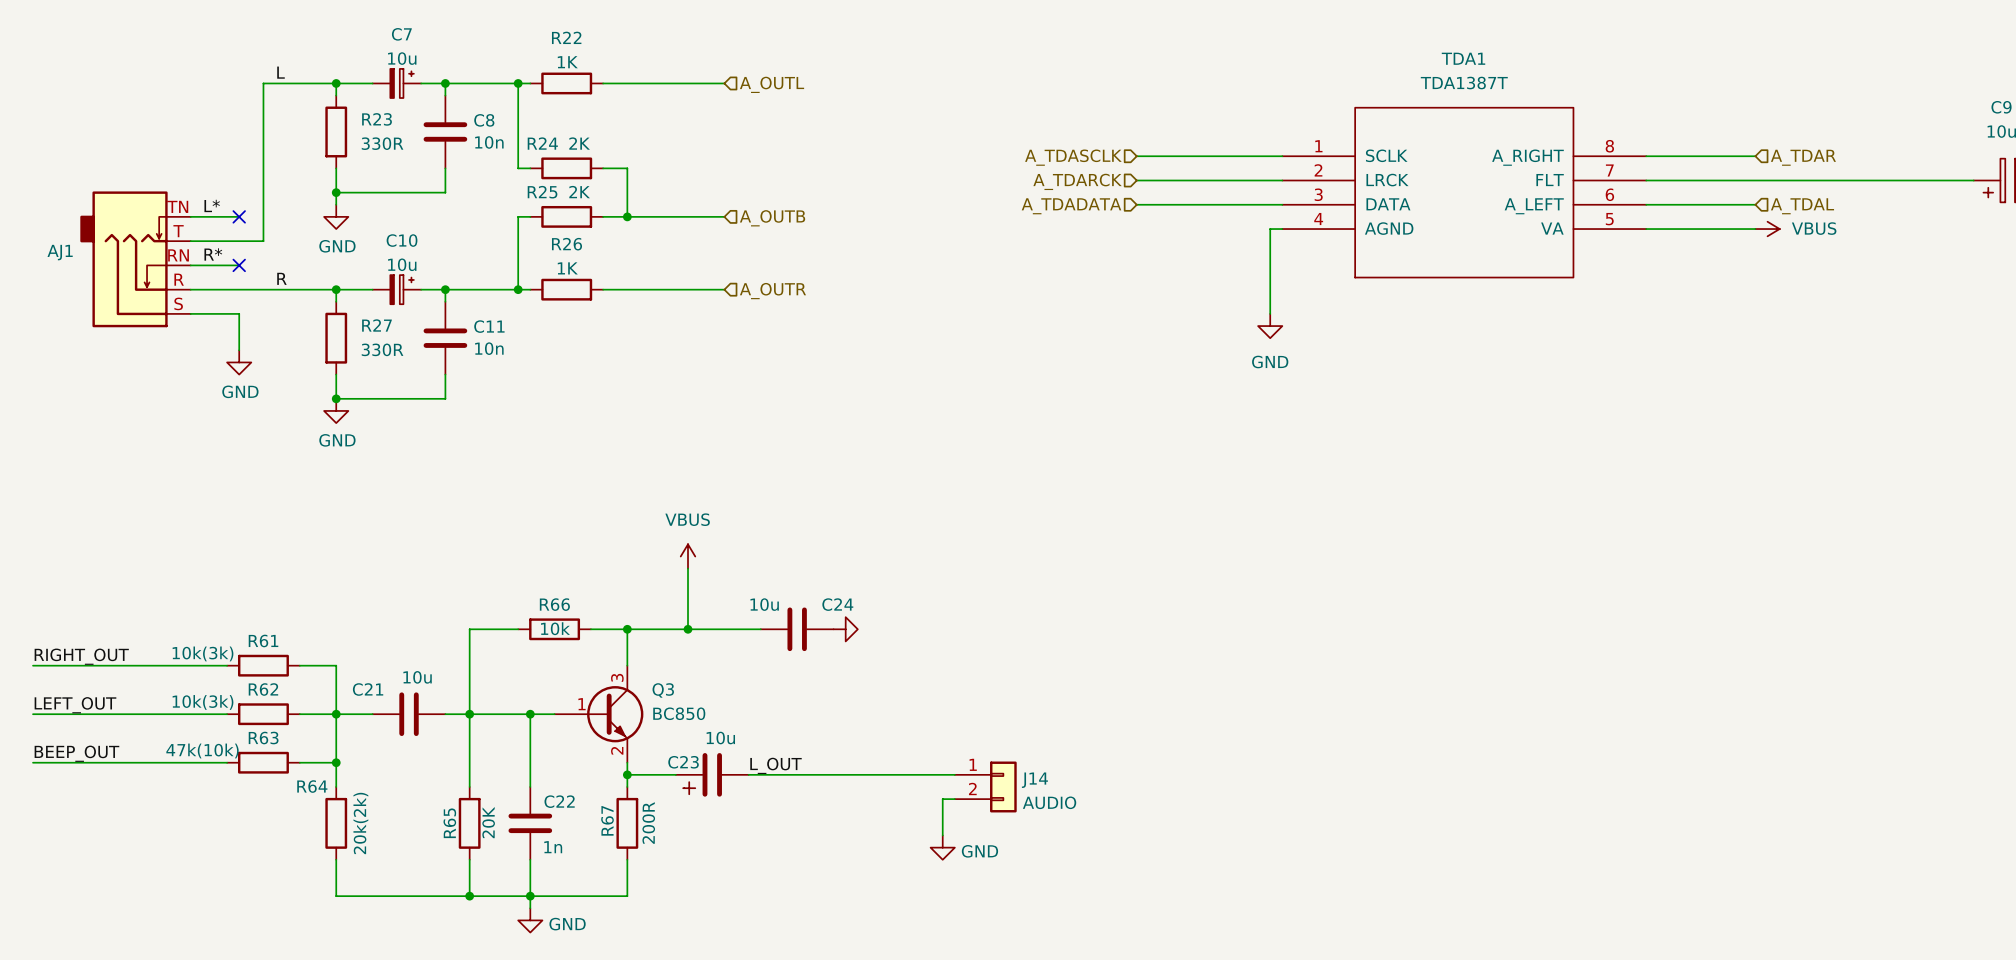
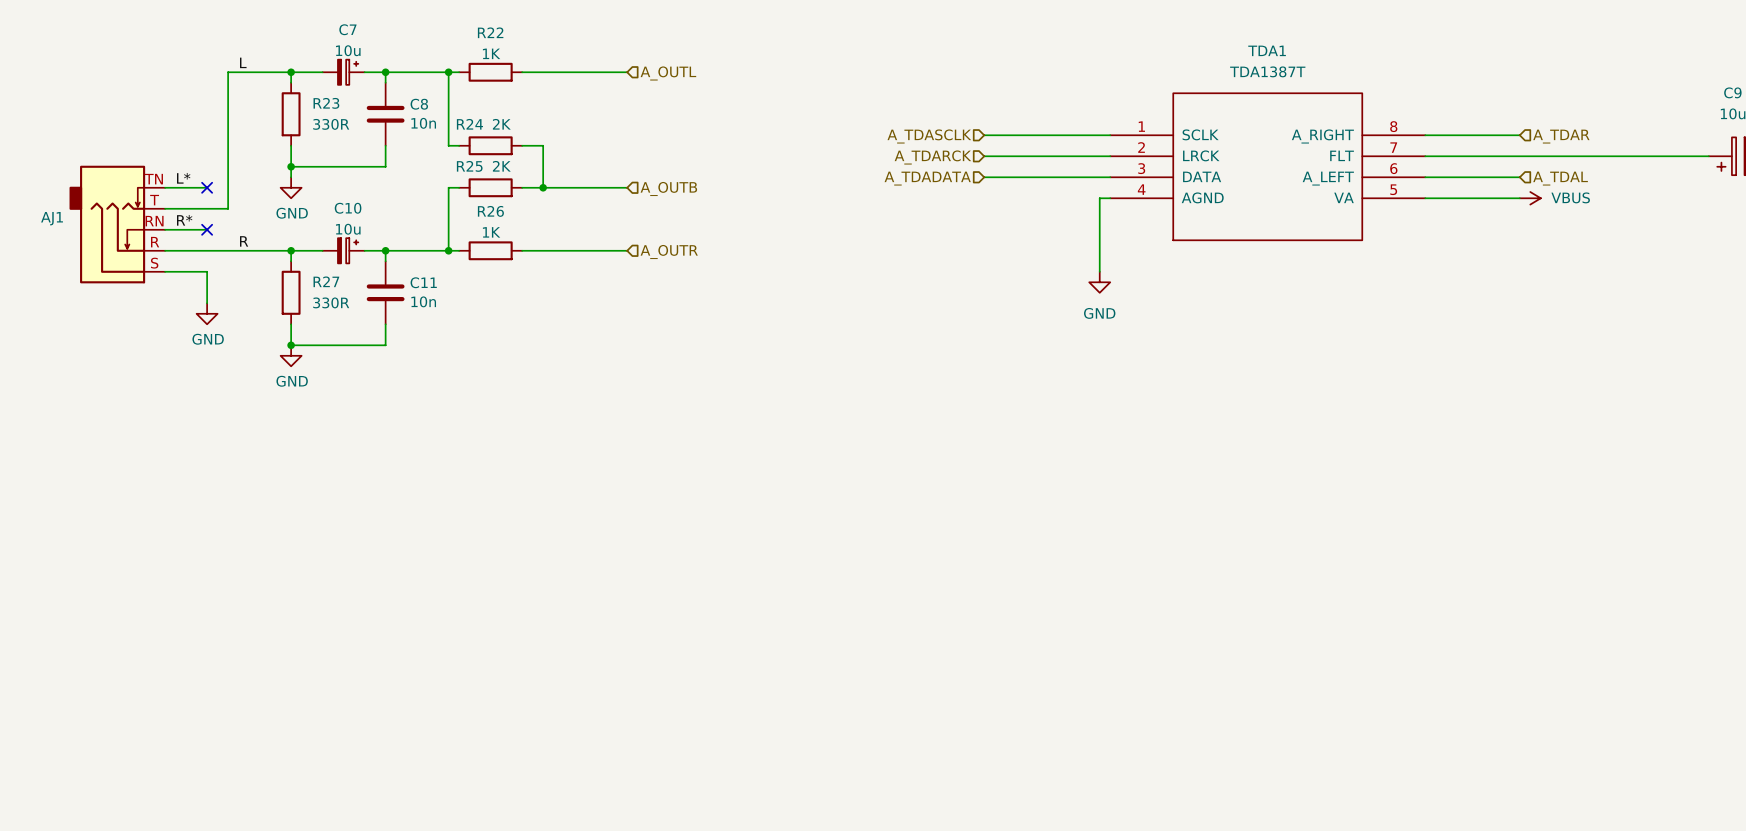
power symbol: VBUS (688, 556) -> none
wire: (688, 568) (688, 629) -> none
wire: (518, 629) (469, 629) (469, 786) -> none
R66: 10k (554, 629) -> none
wire: (590, 629) (760, 629) -> none
wire: (627, 629) (627, 665) -> none
junction: (627, 629) -> none
junction: (688, 629) -> none
C24: 10u (797, 629) -> none
power symbol: (845, 629) -> none
label: RIGHT_OUT (81, 656) -> none
wire: (33, 665) (227, 665) -> none
R61: 10k(3k) (263, 665) -> none
wire: (299, 665) (336, 665) (336, 786) -> none
label: LEFT_OUT (75, 705) -> none
wire: (33, 714) (227, 714) -> none
R62: 10k(3k) (263, 714) -> none
wire: (299, 714) (372, 714) -> none
junction: (336, 714) -> none
C21: 10u (409, 714) -> none
wire: (445, 714) (554, 714) -> none
junction: (469, 714) -> none
wire: (530, 714) (530, 786) -> none
junction: (530, 714) -> none
Q3: BC850 (598, 714) -> none
label: BEEP_OUT (76, 753) -> none
wire: (33, 762) (227, 762) -> none
R63: 47k(10k) (263, 762) -> none
wire: (299, 762) (336, 762) -> none
junction: (336, 762) -> none
wire: (627, 762) (627, 786) -> none
label: L_OUT (776, 765) -> none
wire: (627, 774) (675, 774) -> none
junction: (627, 774) -> none
C23: 10u (712, 774) -> none
wire: (748, 774) (954, 774) -> none
J14: AUDIO (985, 786) -> none
wire: (954, 799) (942, 799) (942, 835) -> none
R64: 20k(2k) (336, 823) -> none
R65: 20K (469, 823) -> none
C22: 1n (530, 823) -> none
R67: 200R (627, 823) -> none
power symbol: GND (942, 847) -> none
wire: (336, 859) (336, 896) (627, 896) (627, 859) -> none
wire: (469, 859) (469, 896) -> none
wire: (530, 859) (530, 908) -> none
junction: (469, 896) -> none
junction: (530, 896) -> none
power symbol: GND (530, 920) -> none

